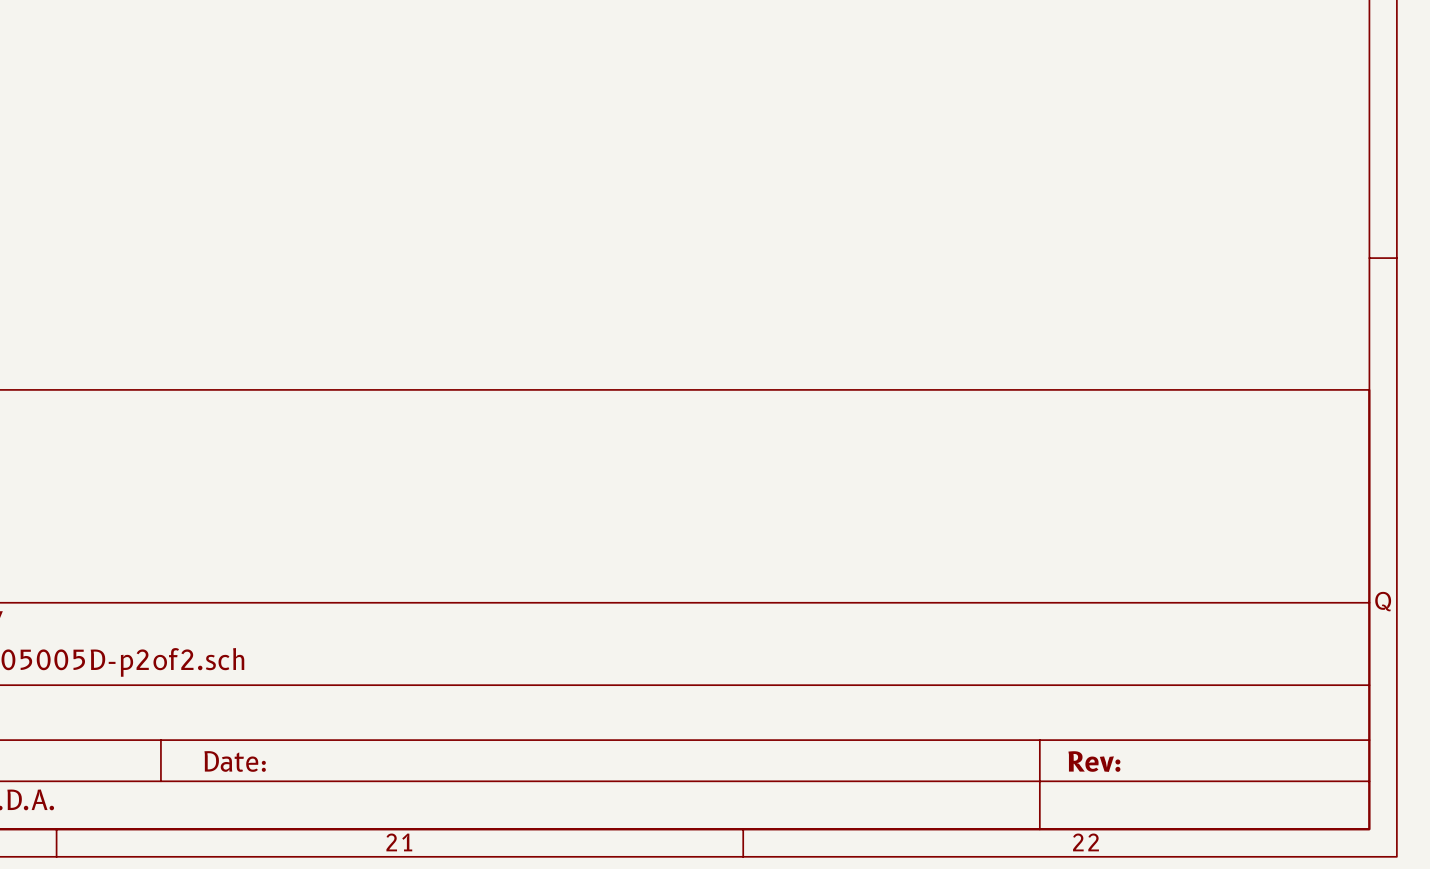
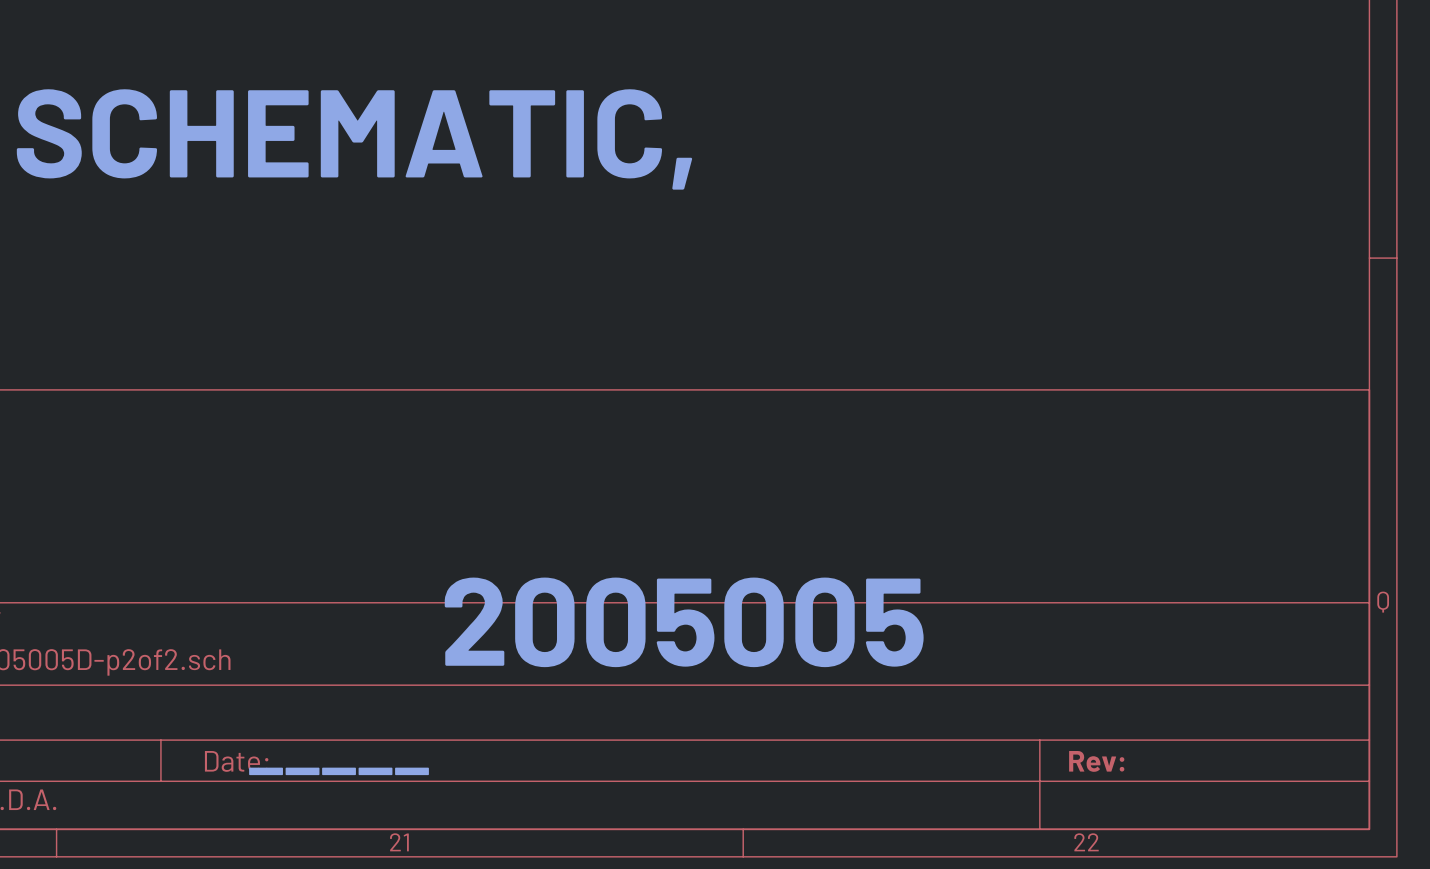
text: none -> SCHEMATIC, (354, 139)
text: none -> 2005005 (684, 622)
text: none -> _____ (339, 771)

